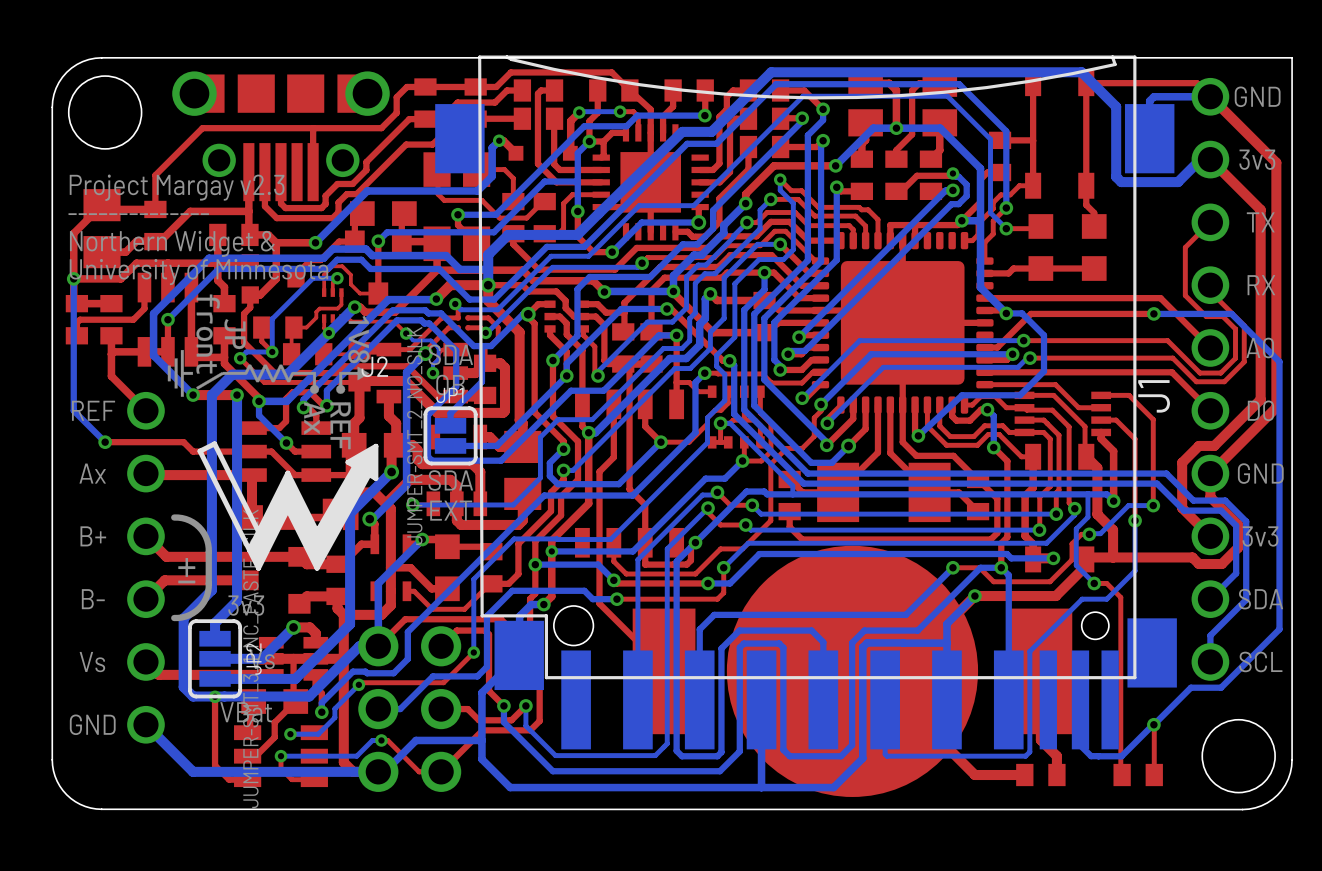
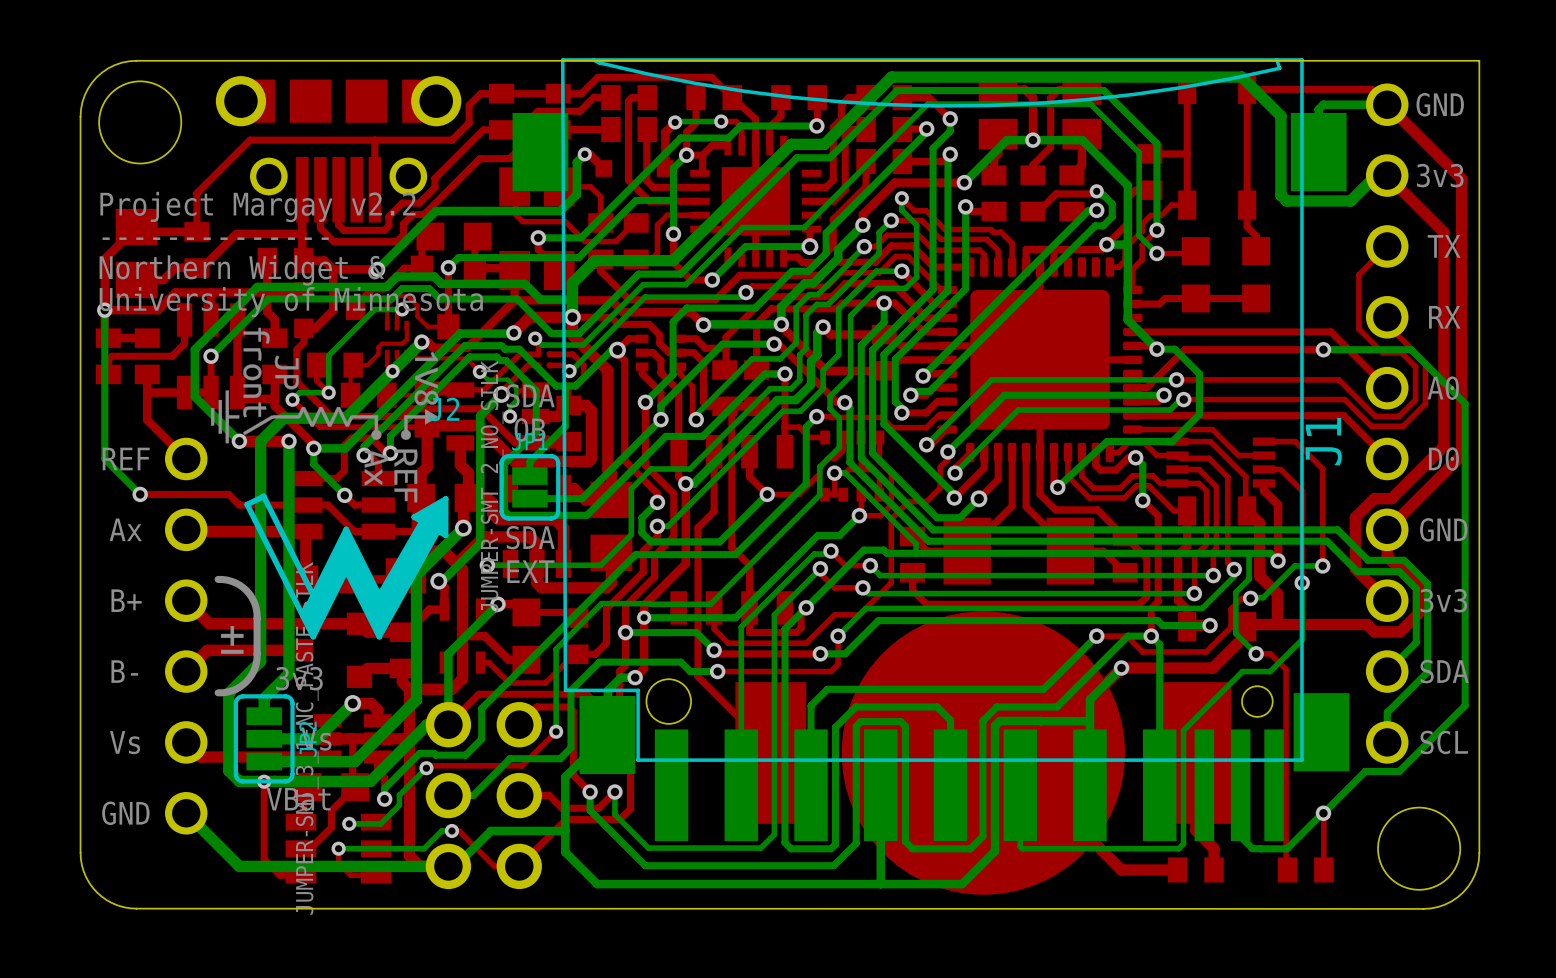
text: Project Margay v2.3 (177, 187) -> Project Margay v2.2 (257, 207)

